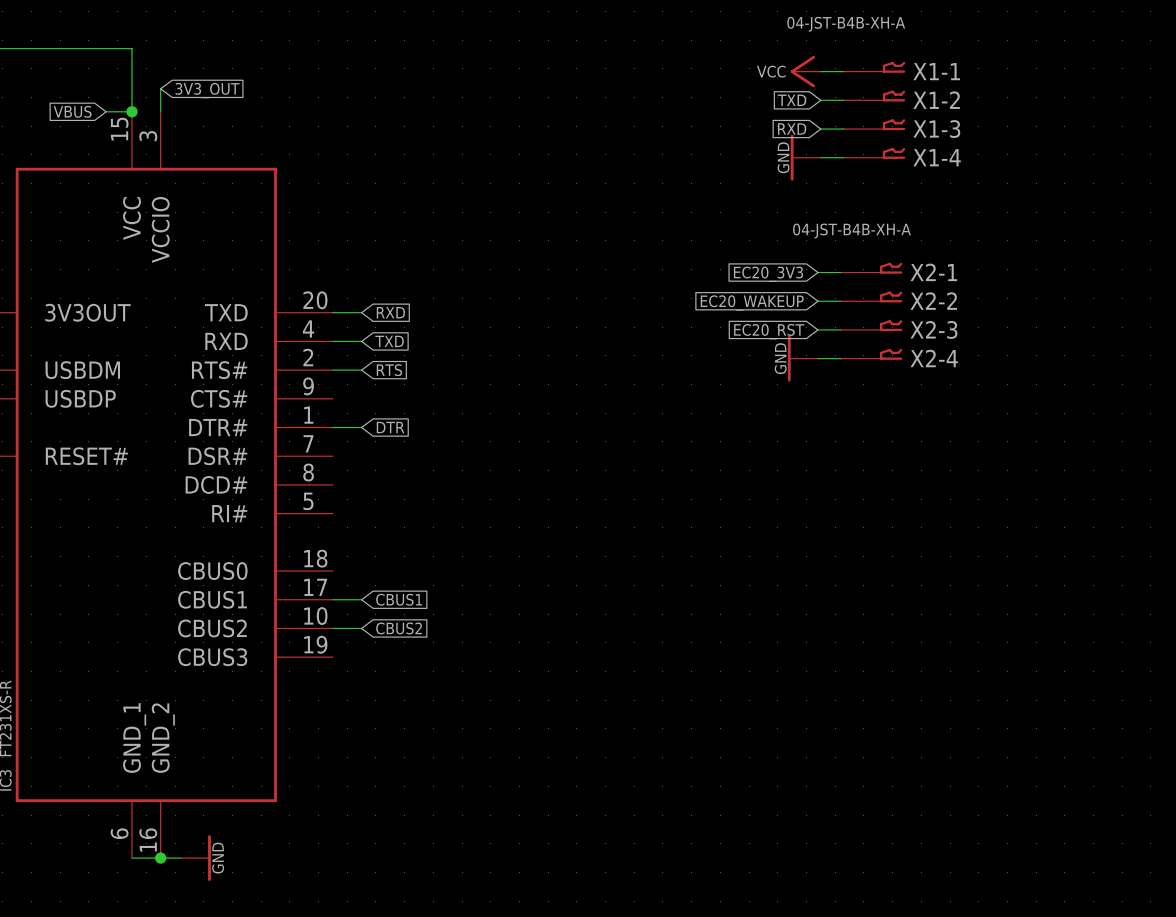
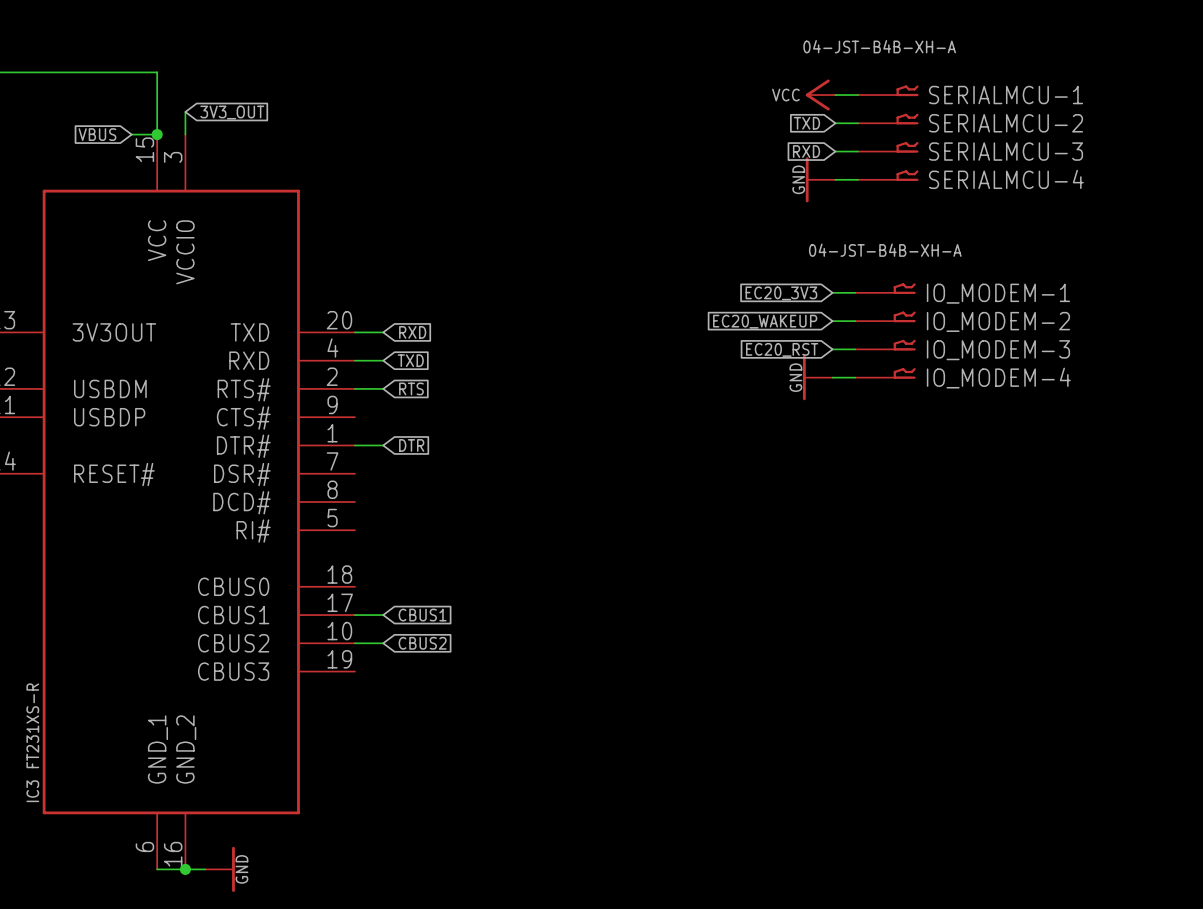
X1-1 name: X1-1 (936, 71) -> SERIALMCU-1 (1006, 95)
X1-2 name: X1-2 (936, 100) -> SERIALMCU-2 (1006, 123)
X1-3 name: X1-3 (936, 129) -> SERIALMCU-3 (1006, 151)
X1-4 name: X1-4 (937, 157) -> SERIALMCU-4 (1006, 179)
X2-1 name: X2-1 (933, 272) -> IO_MODEM-1 (998, 293)
X2-2 name: X2-2 (933, 301) -> IO_MODEM-2 (998, 321)
X2-3 name: X2-3 (933, 329) -> IO_MODEM-3 (998, 350)
X2-4 name: X2-4 (934, 358) -> IO_MODEM-4 (998, 378)

